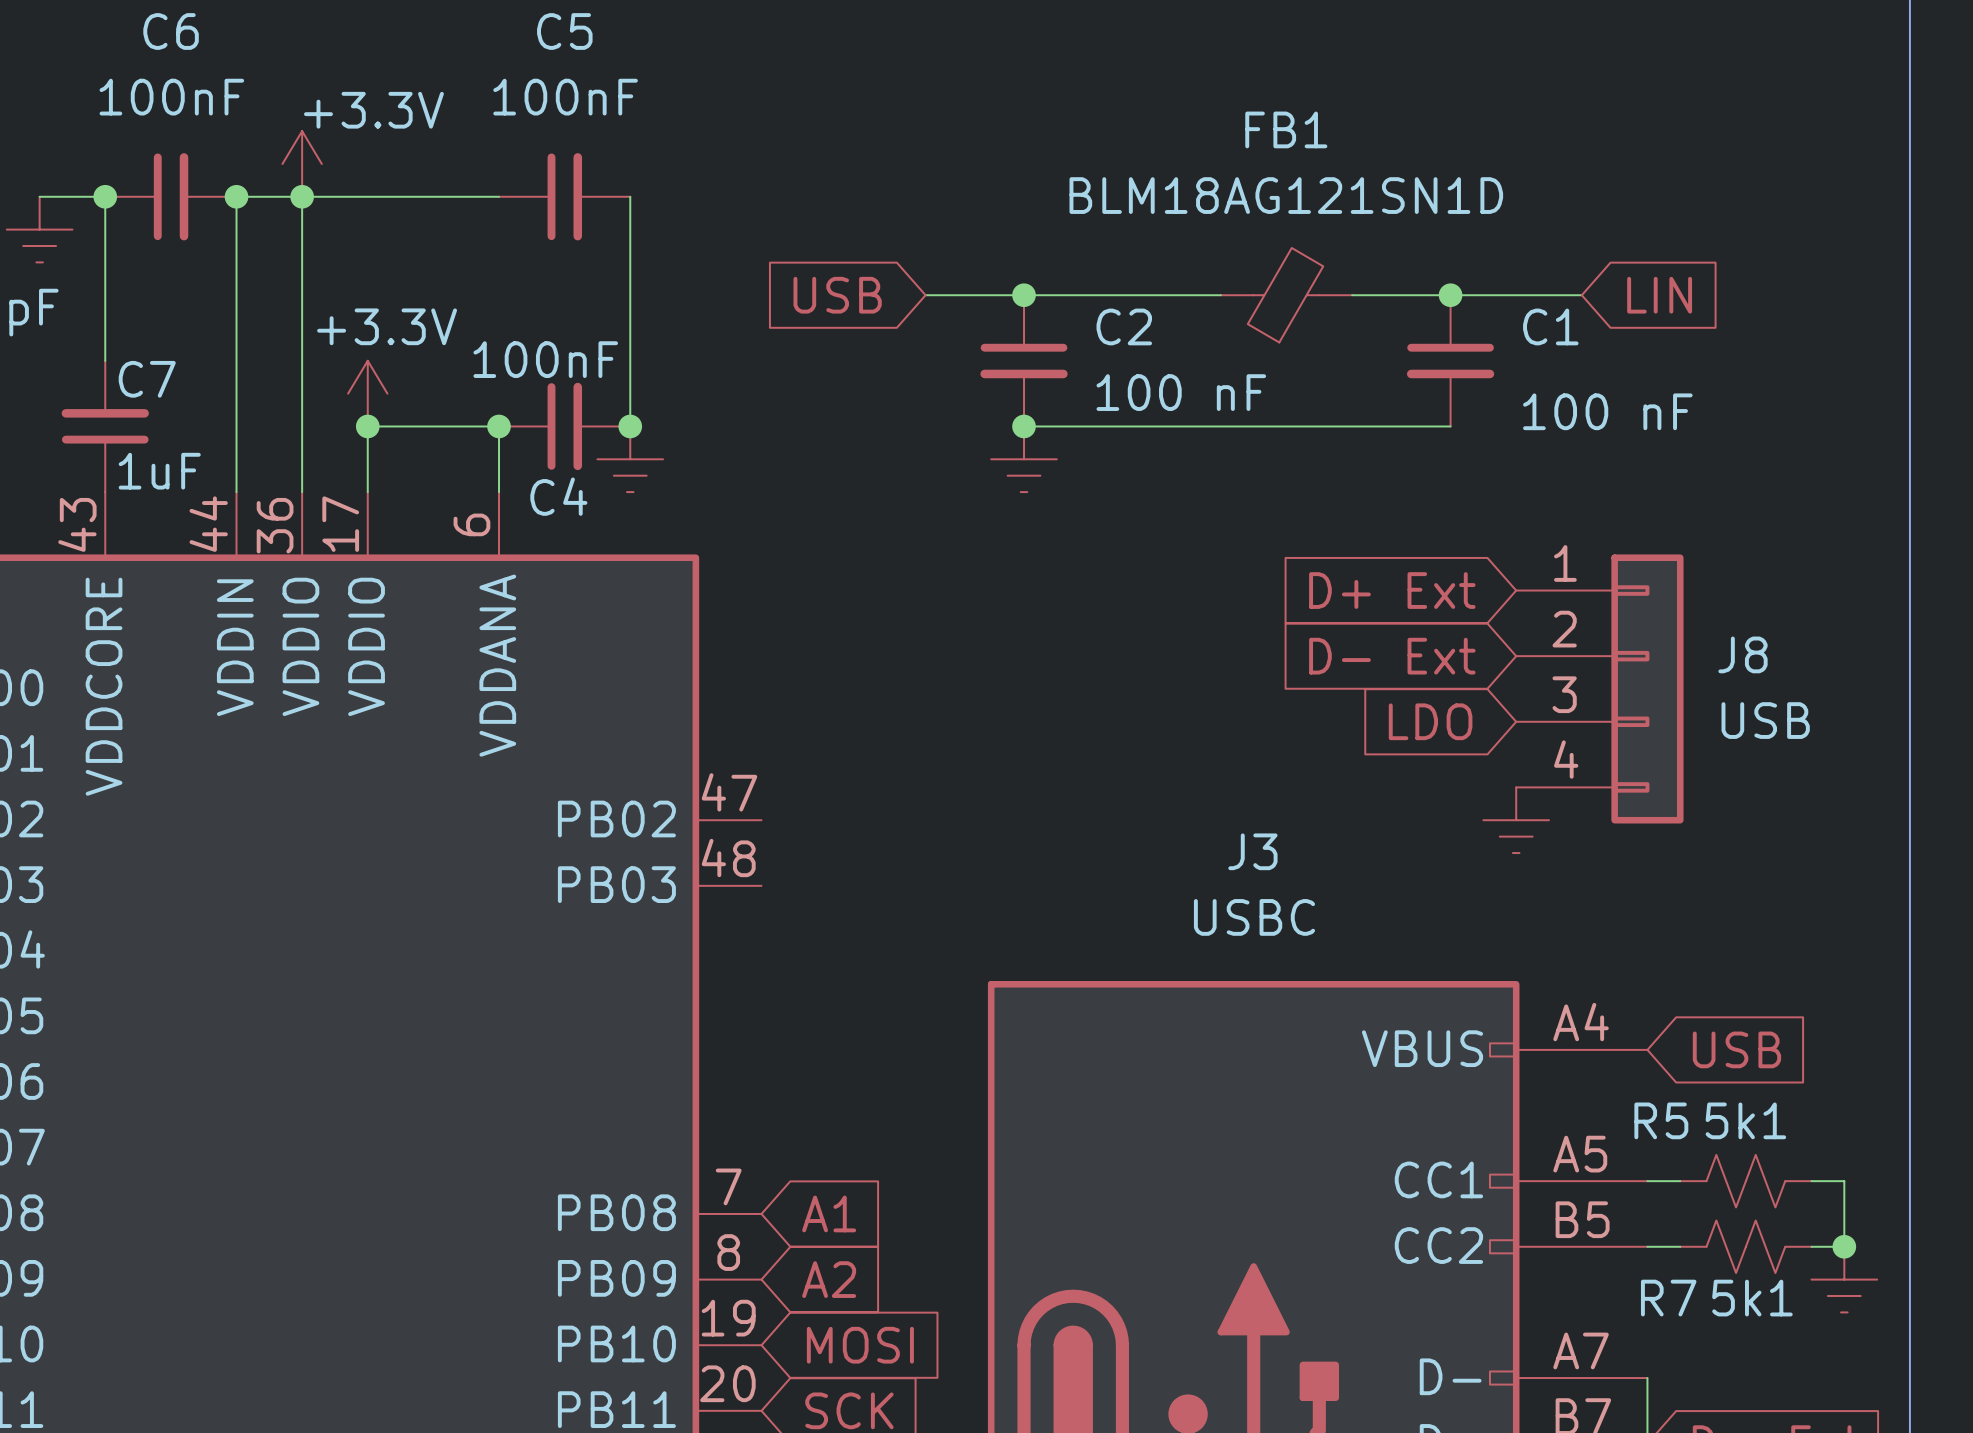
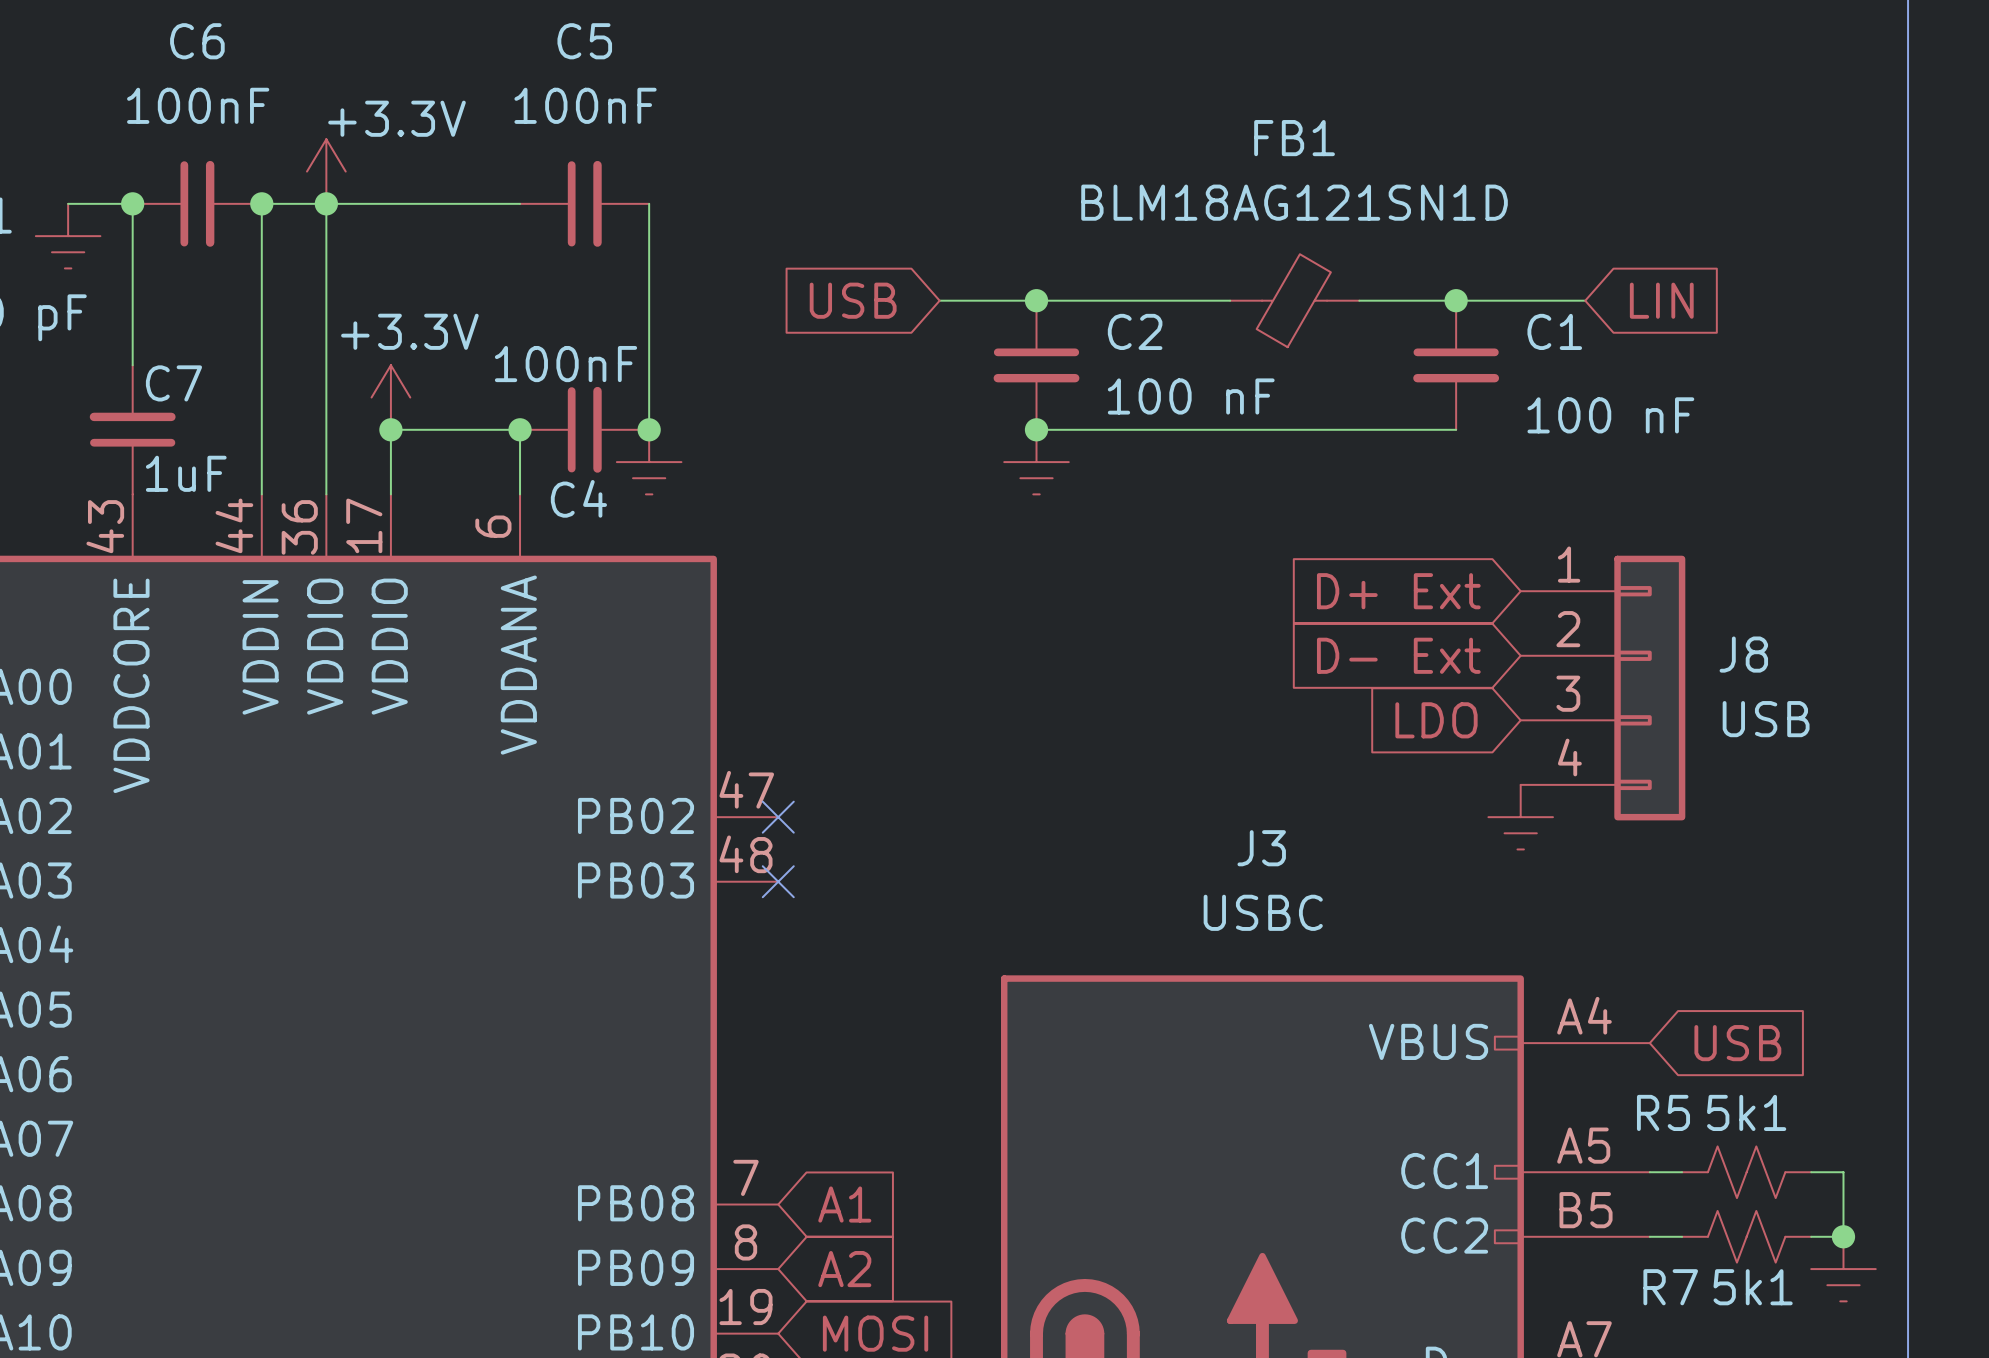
no-connect mark: none -> (778, 817)
no-connect mark: none -> (778, 881)

